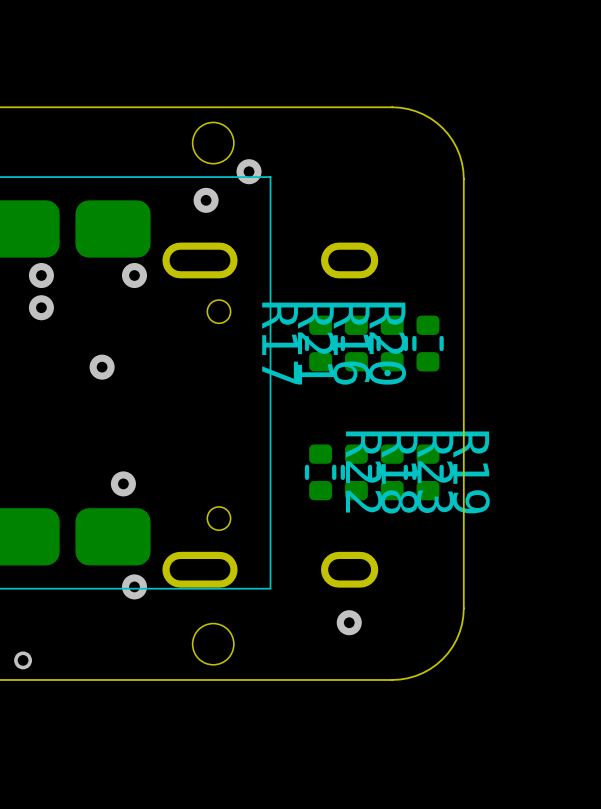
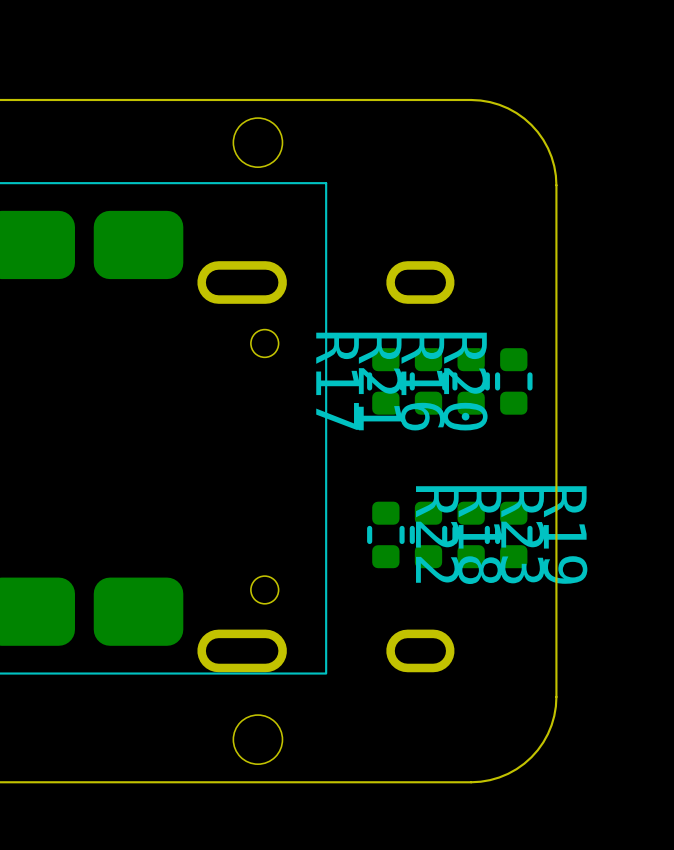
via: (249, 171) -> none
via: (206, 200) -> none
via: (41, 275) -> none
via: (134, 275) -> none
via: (41, 307) -> none
via: (102, 367) -> none
via: (123, 483) -> none
via: (134, 586) -> none
via: (349, 622) -> none
via: (23, 660) -> none

